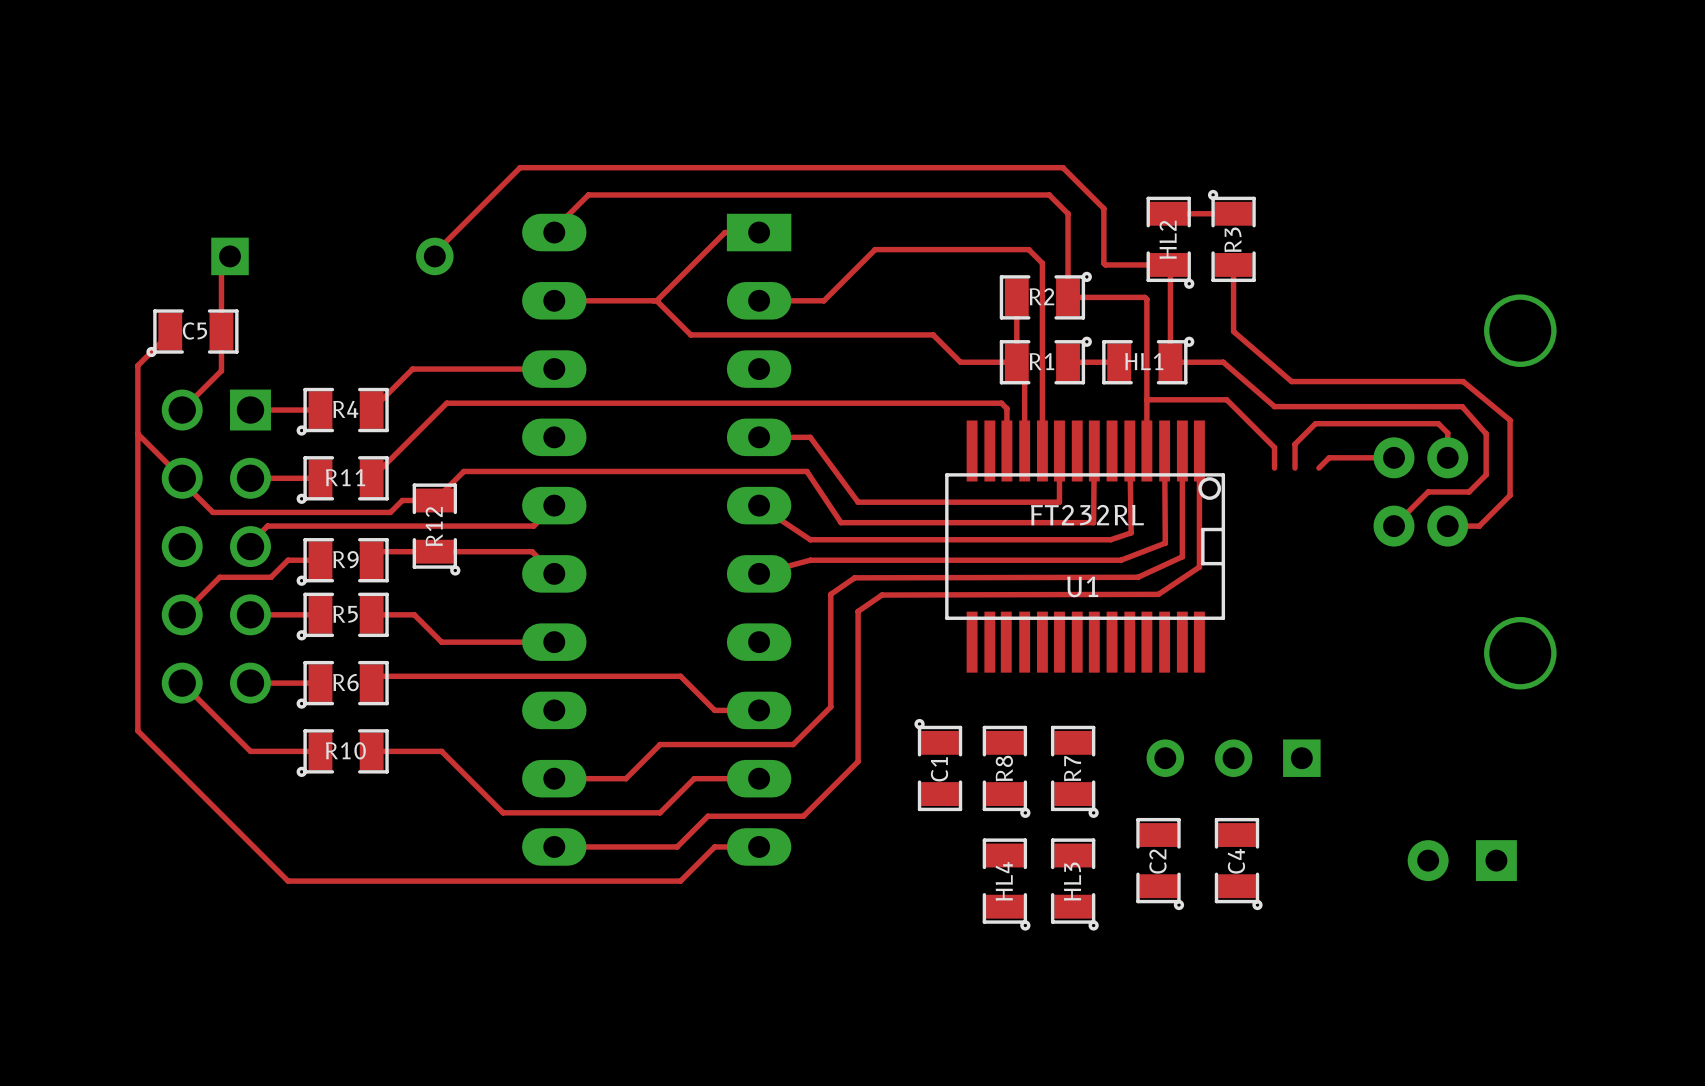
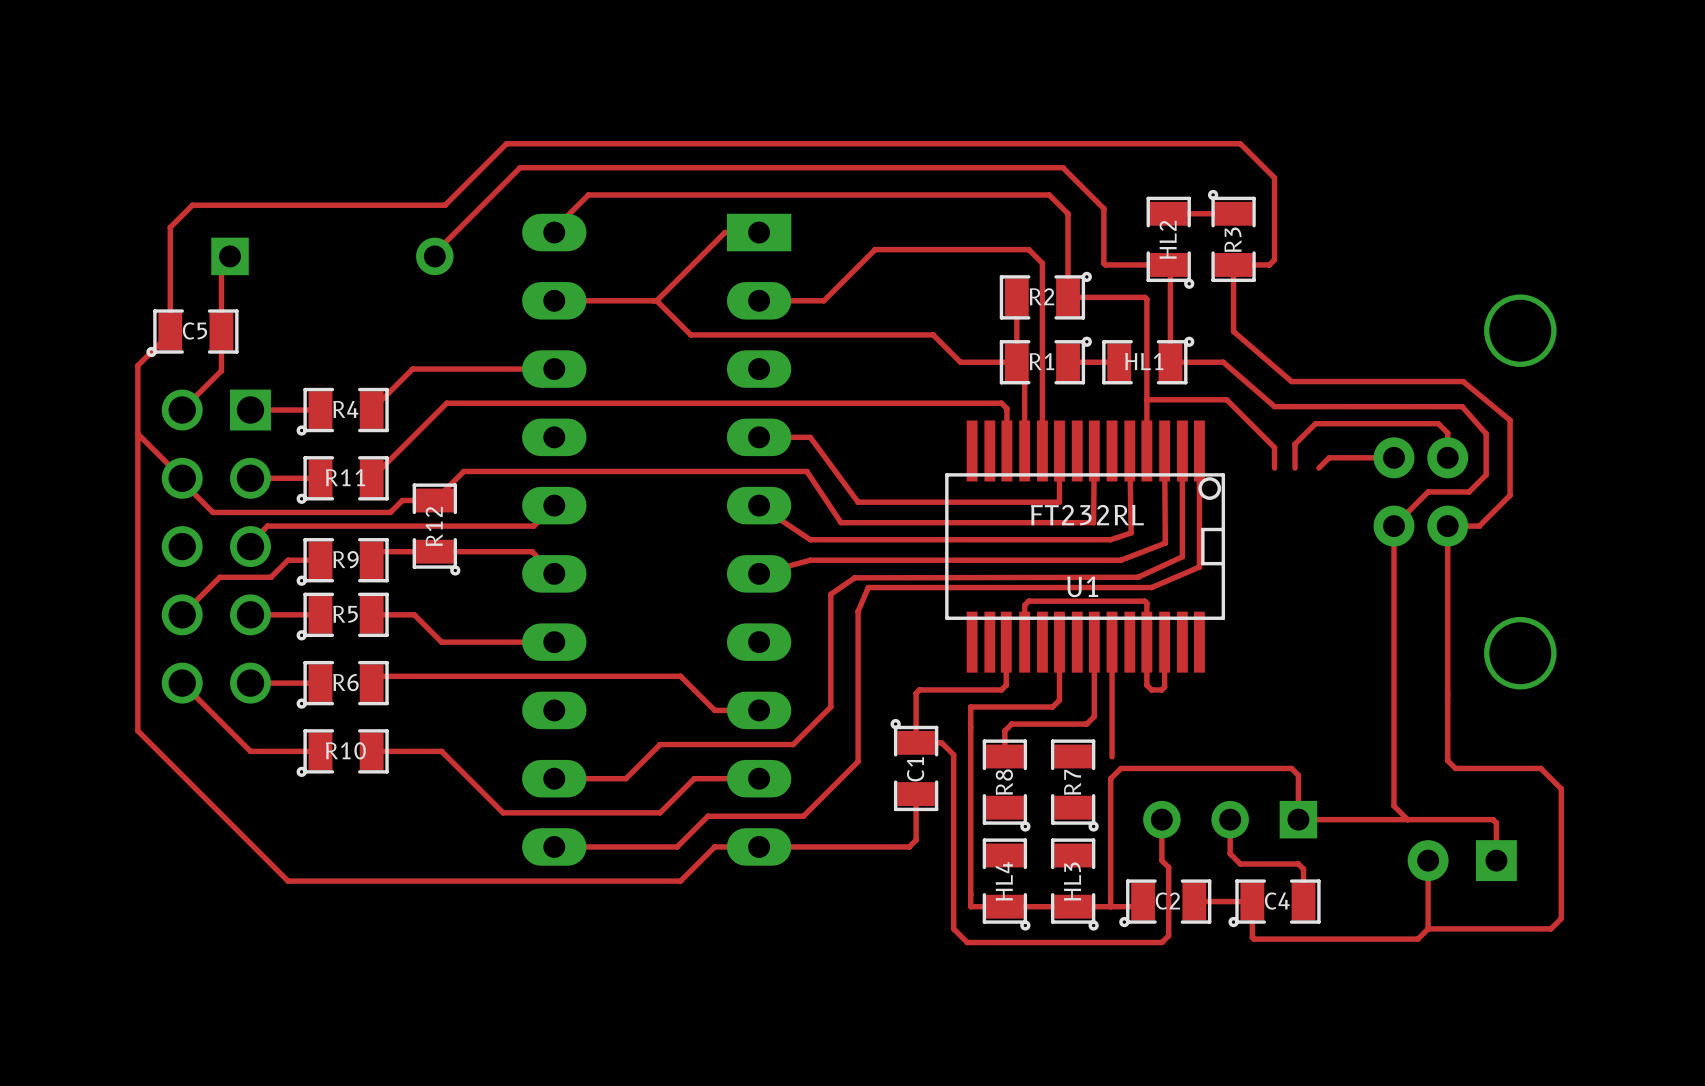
top track: none -> (1233, 264) (1269, 264) (1274, 259) (1274, 177) (1240, 143) (506, 143) (445, 205) (192, 205) (170, 227) (170, 331)
top track: none -> (1394, 526) (1394, 805) (1407, 819)
top track: none -> (1447, 526) (1447, 760) (1455, 768) (1540, 768) (1561, 788) (1561, 918) (1551, 928) (1428, 928)
top track: (1199, 567) (1158, 594) (881, 595) (858, 611) -> (1199, 567) (1151, 587) (868, 587) (858, 611)
top track: none -> (1006, 642) (1006, 685) (1001, 689) (919, 689) (916, 693) (916, 742) (941, 742) (953, 754) (953, 928) (967, 942) (1161, 942) (1168, 935) (1168, 867) (1161, 860) (1161, 819)
top track: none -> (1024, 642) (1024, 605) (1028, 601) (1144, 601) (1146, 603) (1146, 685) (1151, 689) (1161, 689) (1164, 687) (1164, 642)
top track: none -> (1059, 642) (1059, 700) (1052, 707) (970, 707) (970, 906) (1138, 906) (1143, 901)
top track: none -> (1094, 642) (1094, 716) (1086, 724) (1011, 724) (1004, 730) (1004, 756)
top track: none -> (1112, 642) (1112, 756)
part position: (1233, 758) -> (1230, 819)
C1 position: (938, 765) -> (914, 765)
R8 position: (1006, 771) -> (1006, 785)
R7 position: (1074, 771) -> (1074, 785)
top track: none -> (916, 794) (916, 840) (909, 846) (759, 846)
top track: none -> (1230, 819) (1230, 853) (1240, 864) (1298, 864) (1303, 869) (1303, 901)
top track: none -> (1428, 860) (1428, 928)
top track: none -> (1496, 860) (1496, 823) (1493, 819) (1298, 819) (1298, 775) (1291, 768) (1120, 768) (1110, 778) (1110, 906)
C2 rotation: 0° (1160, 864) -> 90° clockwise (1165, 903)
C4 rotation: 0° (1238, 864) -> 90° clockwise (1274, 903)
top track: none -> (1194, 901) (1252, 901) (1252, 937) (1254, 939) (1417, 939) (1428, 928)

